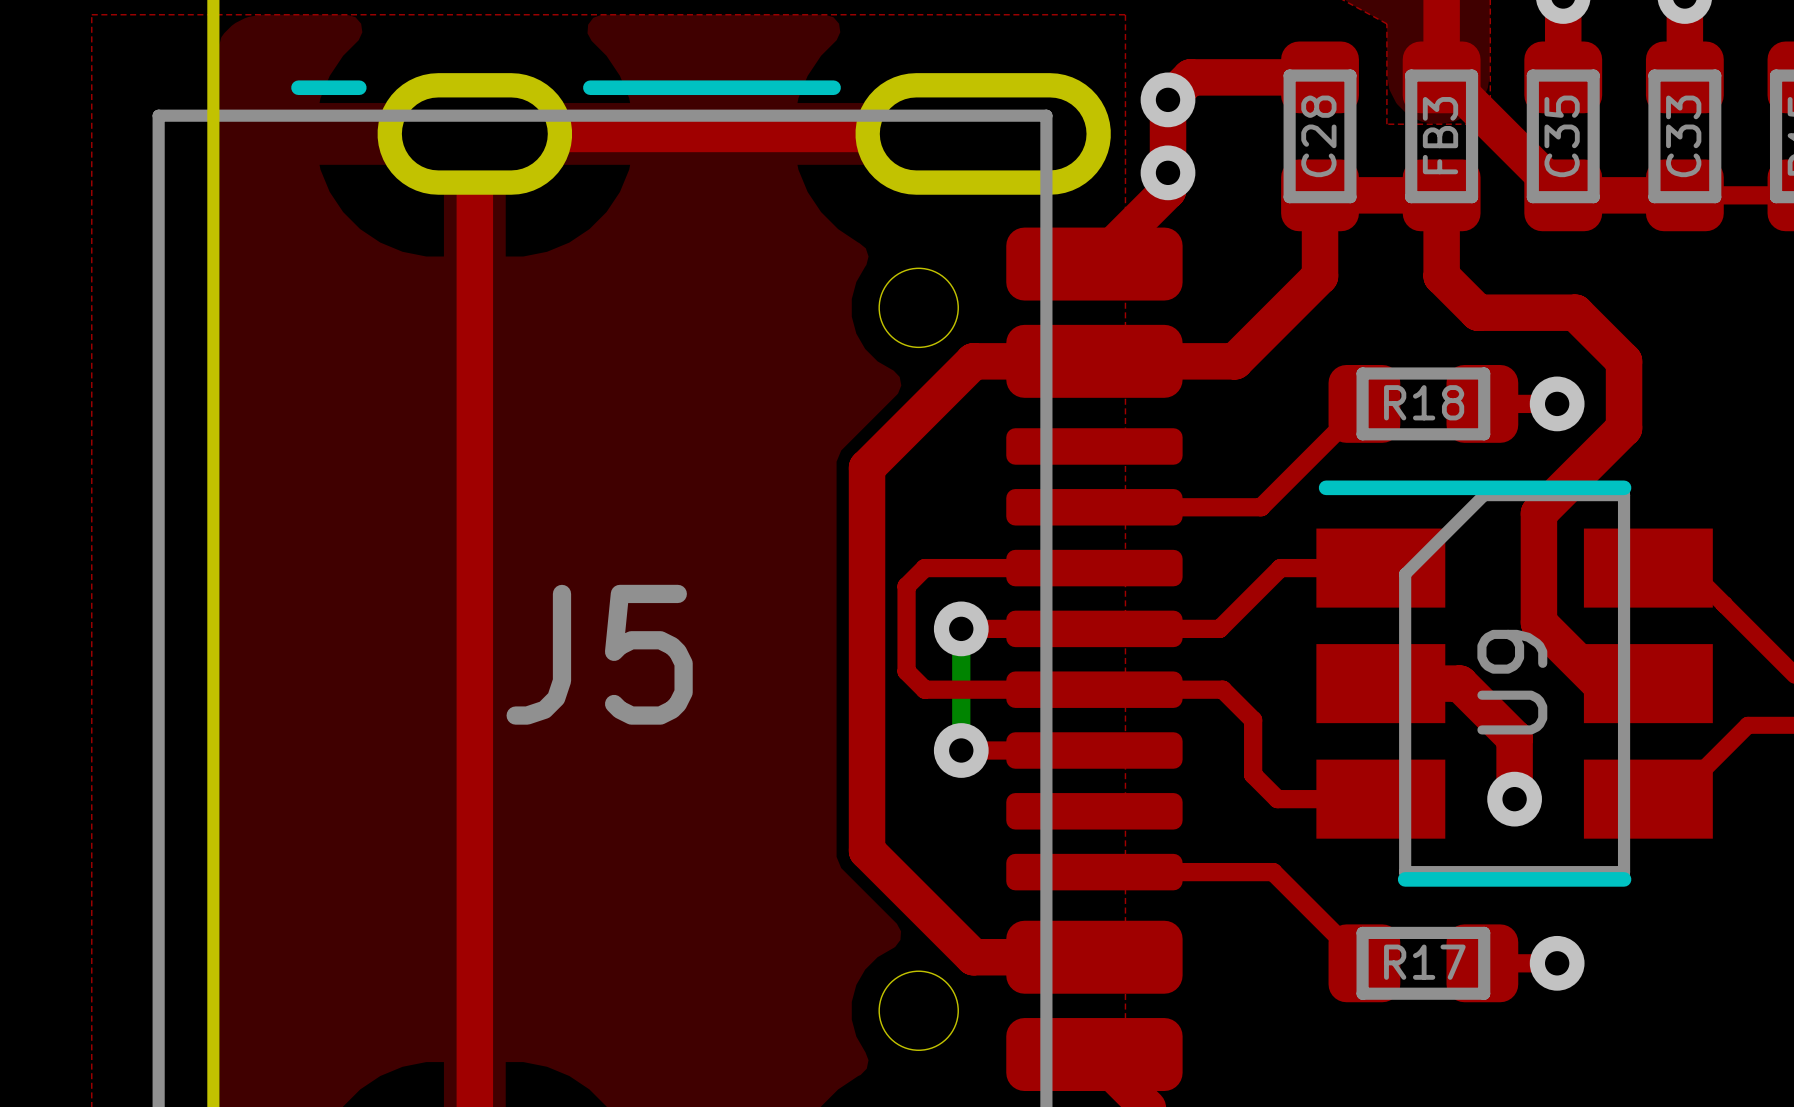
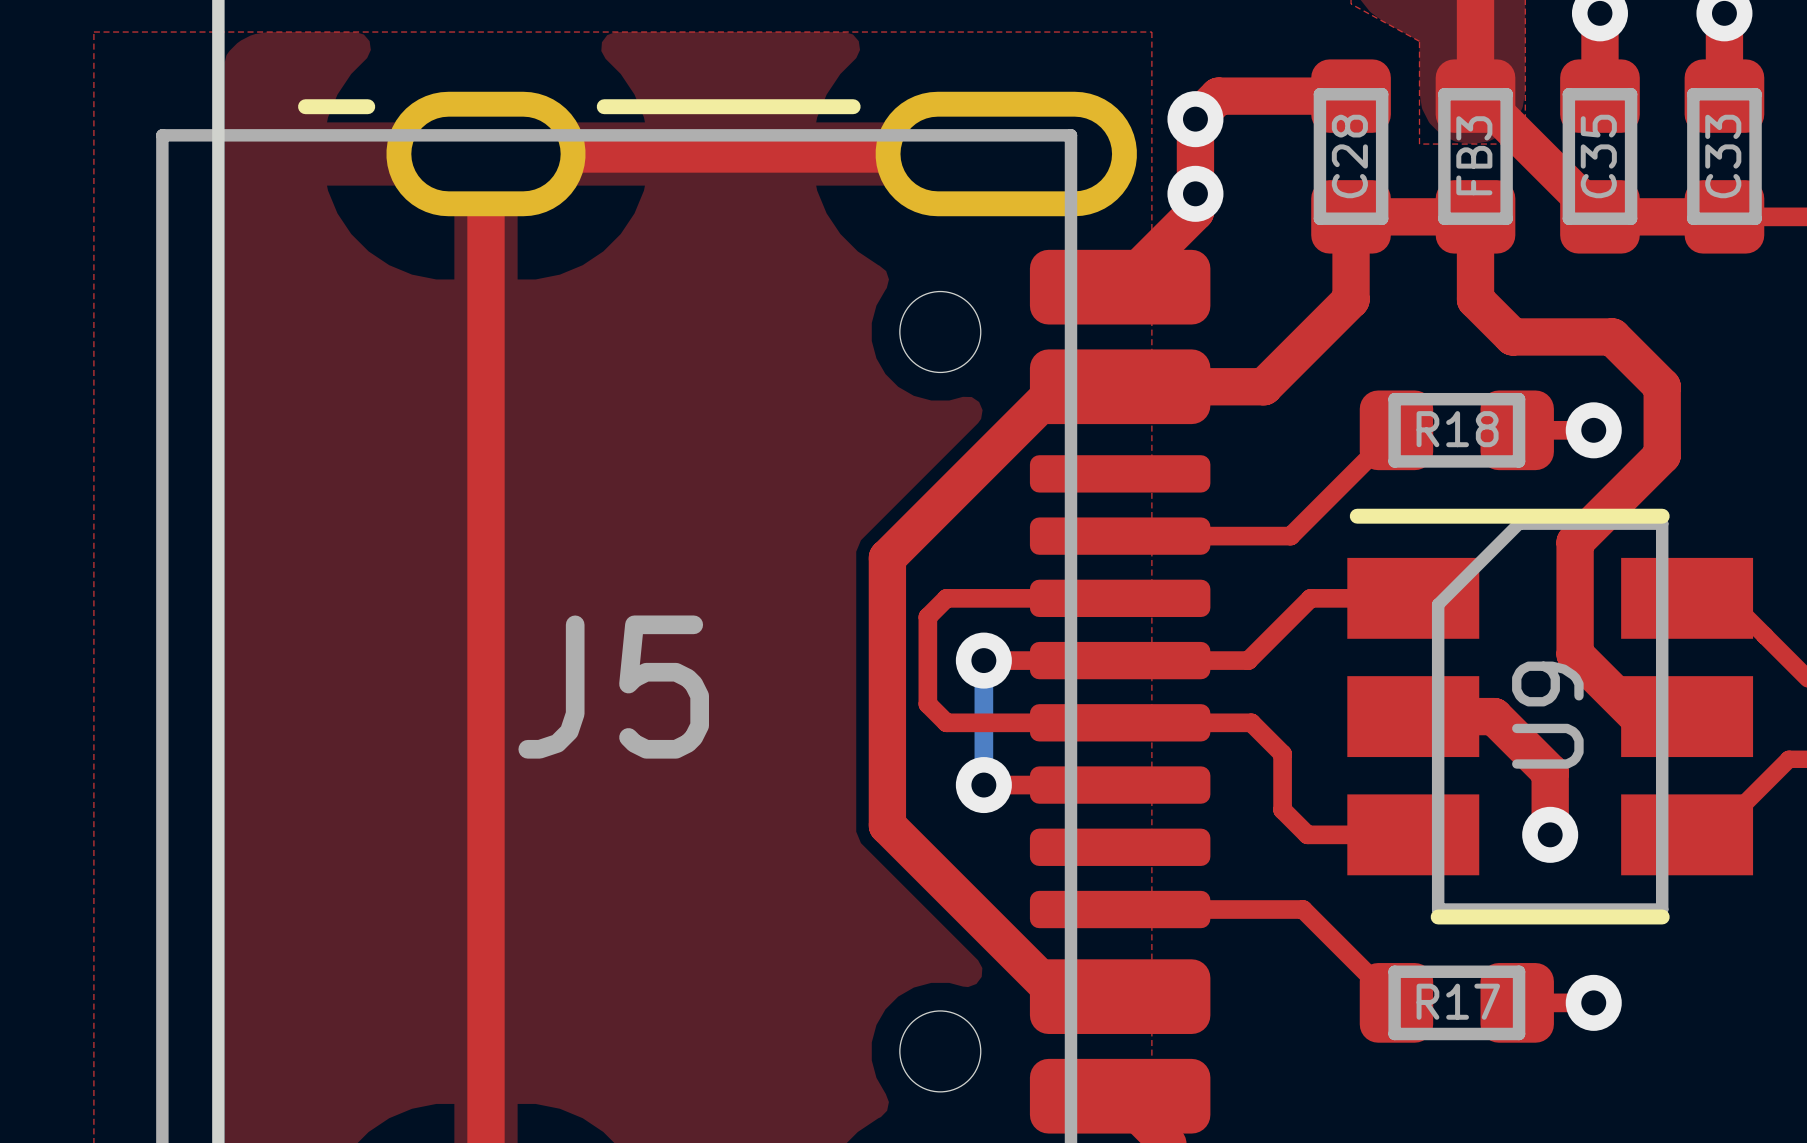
top track: (1034, 361) (973, 361) (867, 467) (867, 528) -> (1058, 386) (887, 557)
top track: (867, 790) (867, 850) (973, 957) (1034, 957) -> (887, 825) (1058, 996)

